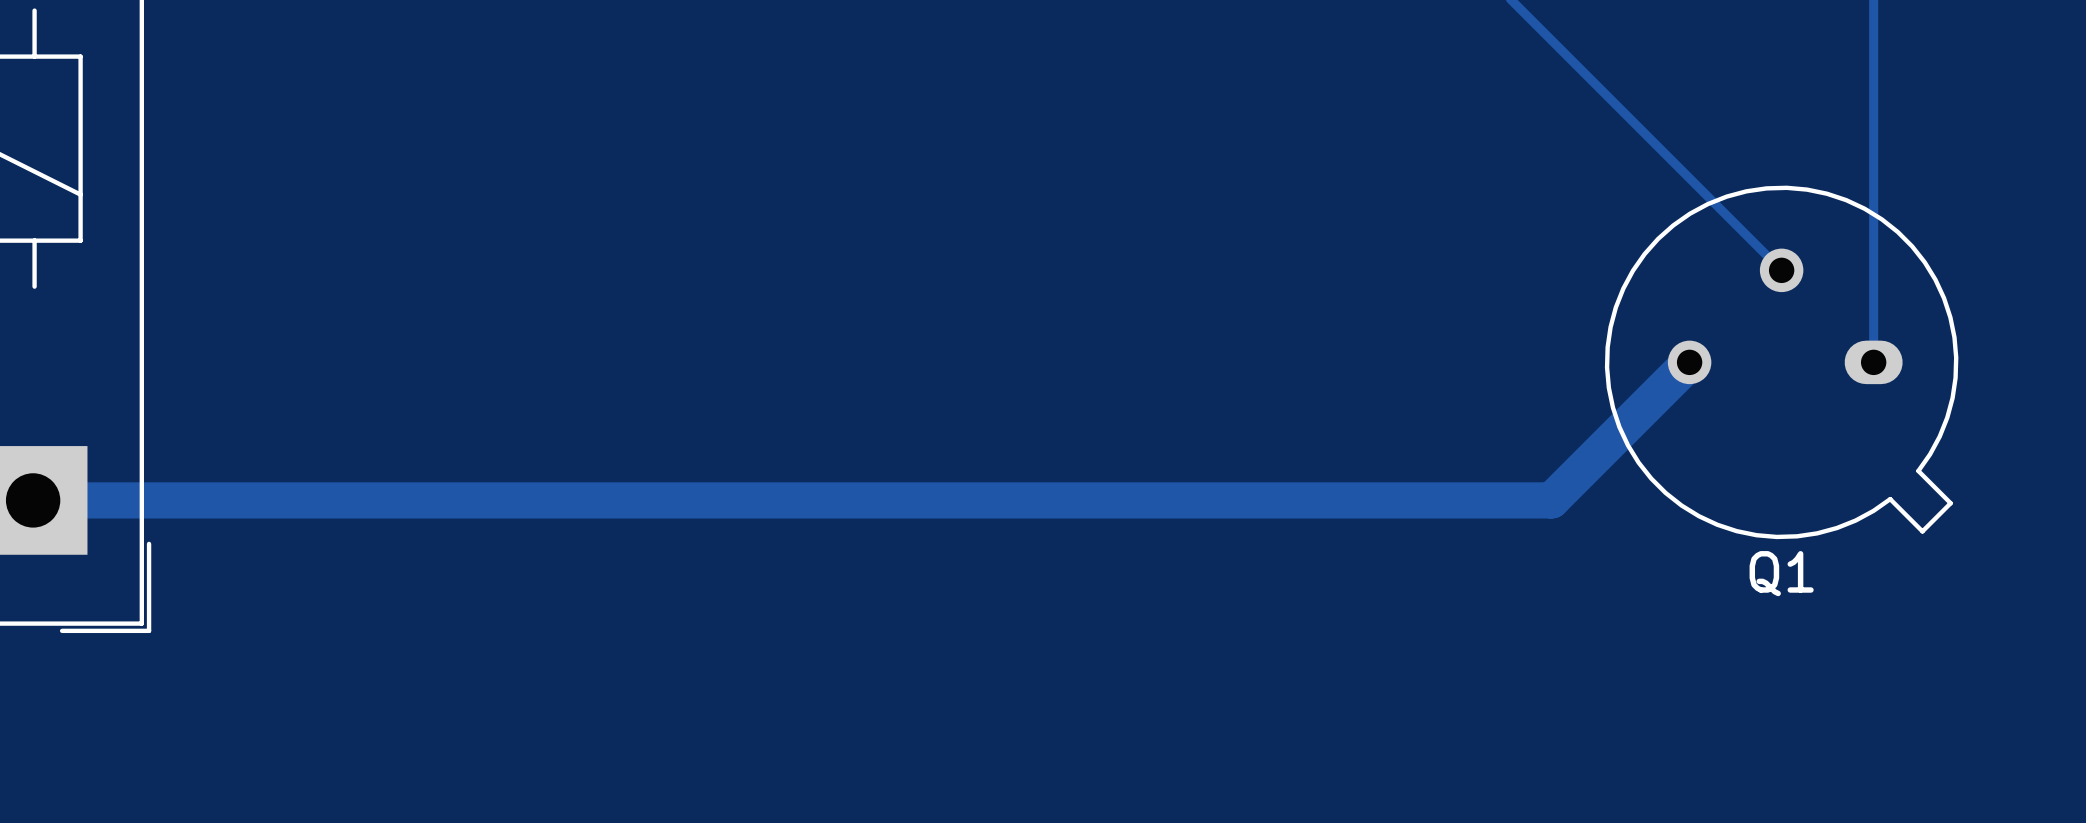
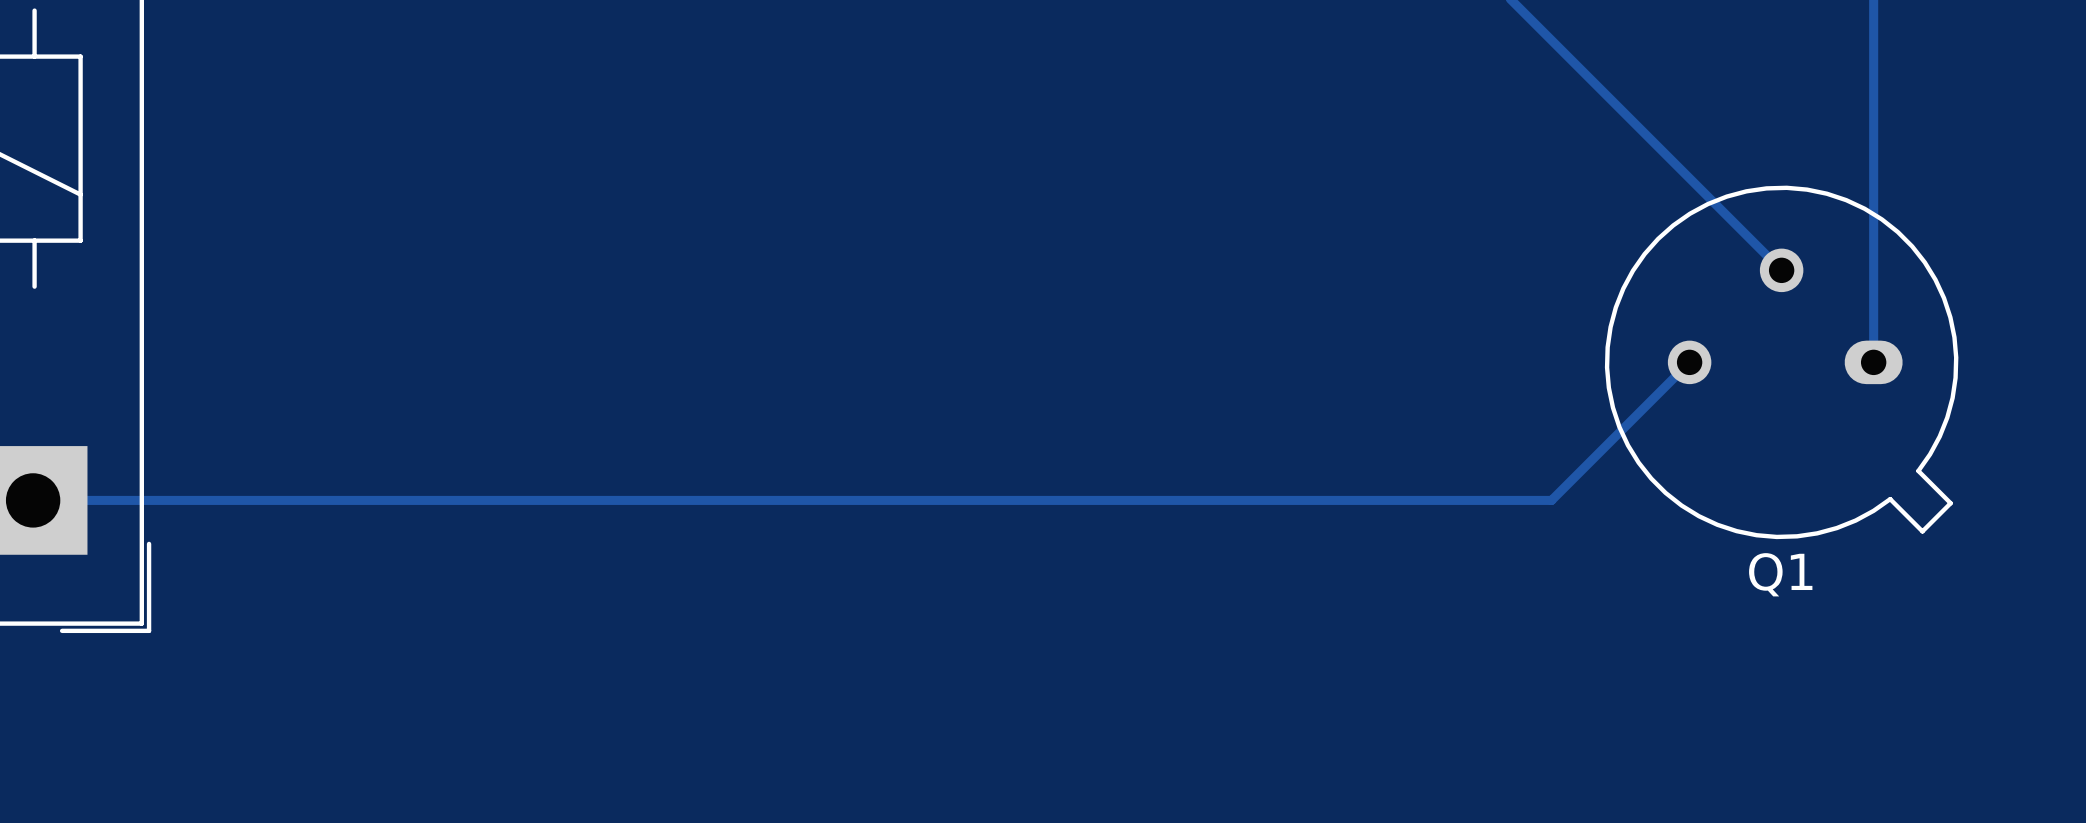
track width: thick (1689, 362) (1551, 500) (33, 500) -> thin (1689, 362) (1551, 500) (33, 500)

